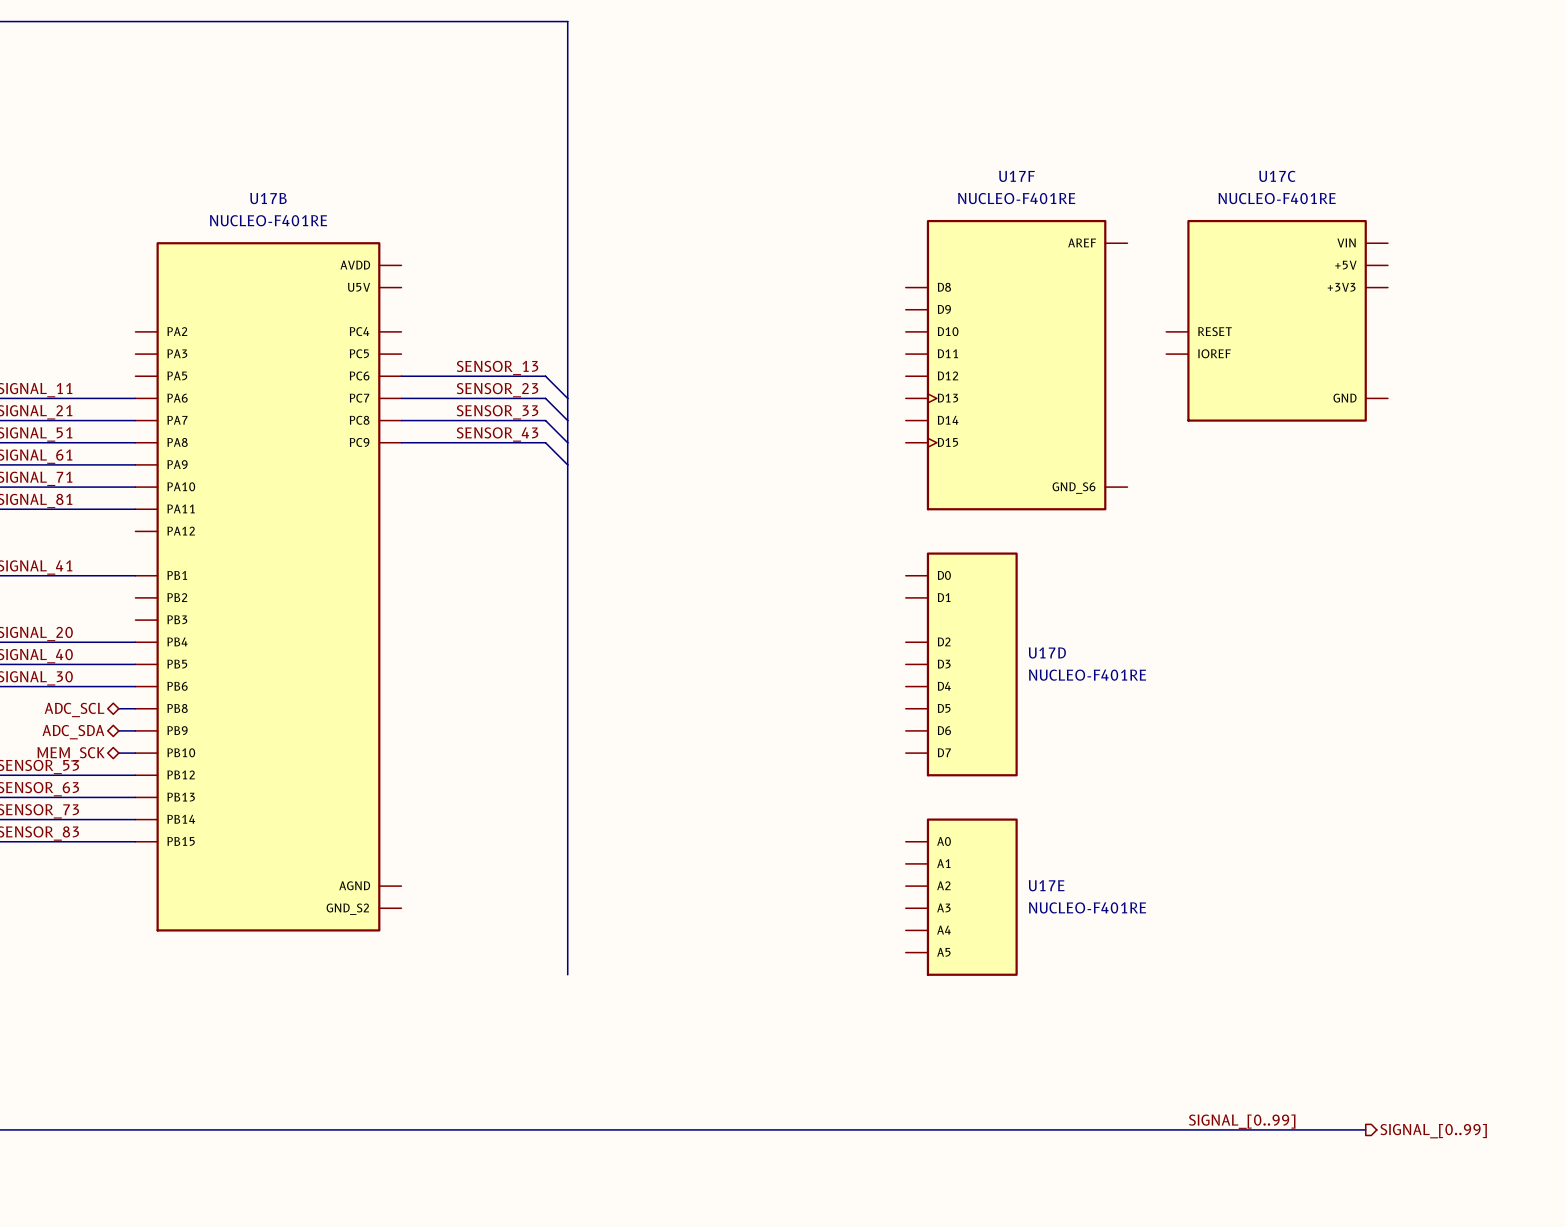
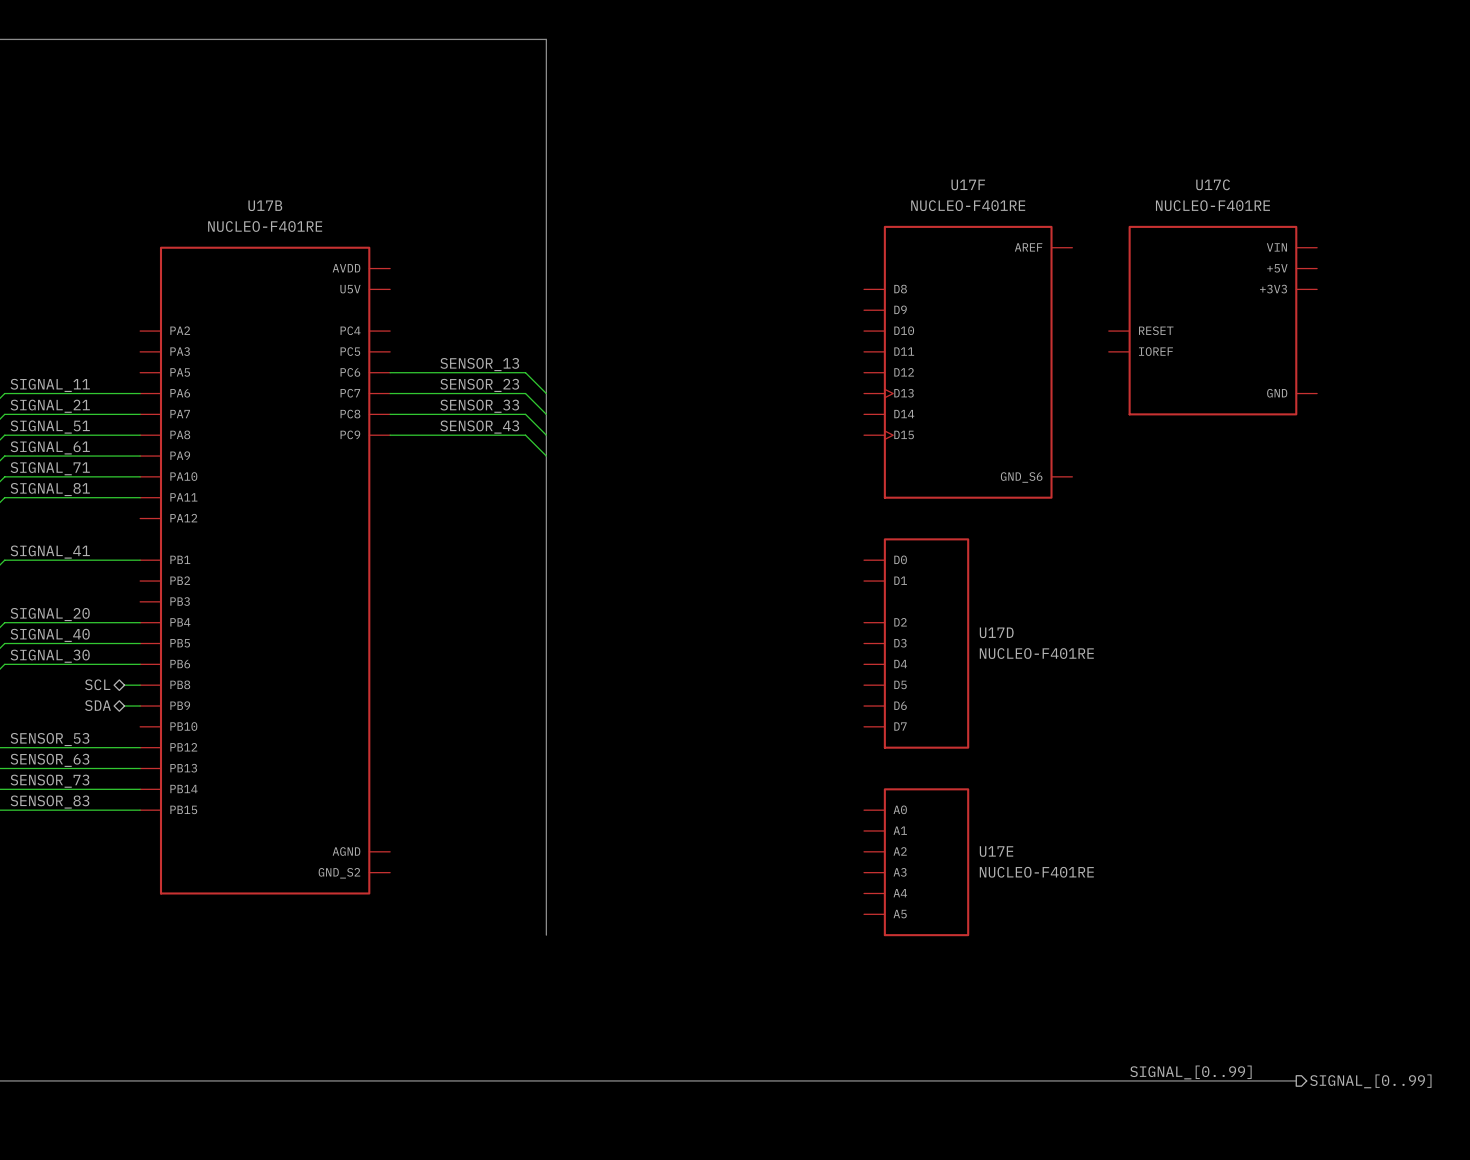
hierarchical label: ADC_SCL (74, 710) -> SCL (97, 684)
hierarchical label: ADC_SDA (73, 732) -> SDA (97, 705)
wire: (118, 753) (135, 753) -> none
hierarchical label: MEM_SCK (71, 754) -> none

